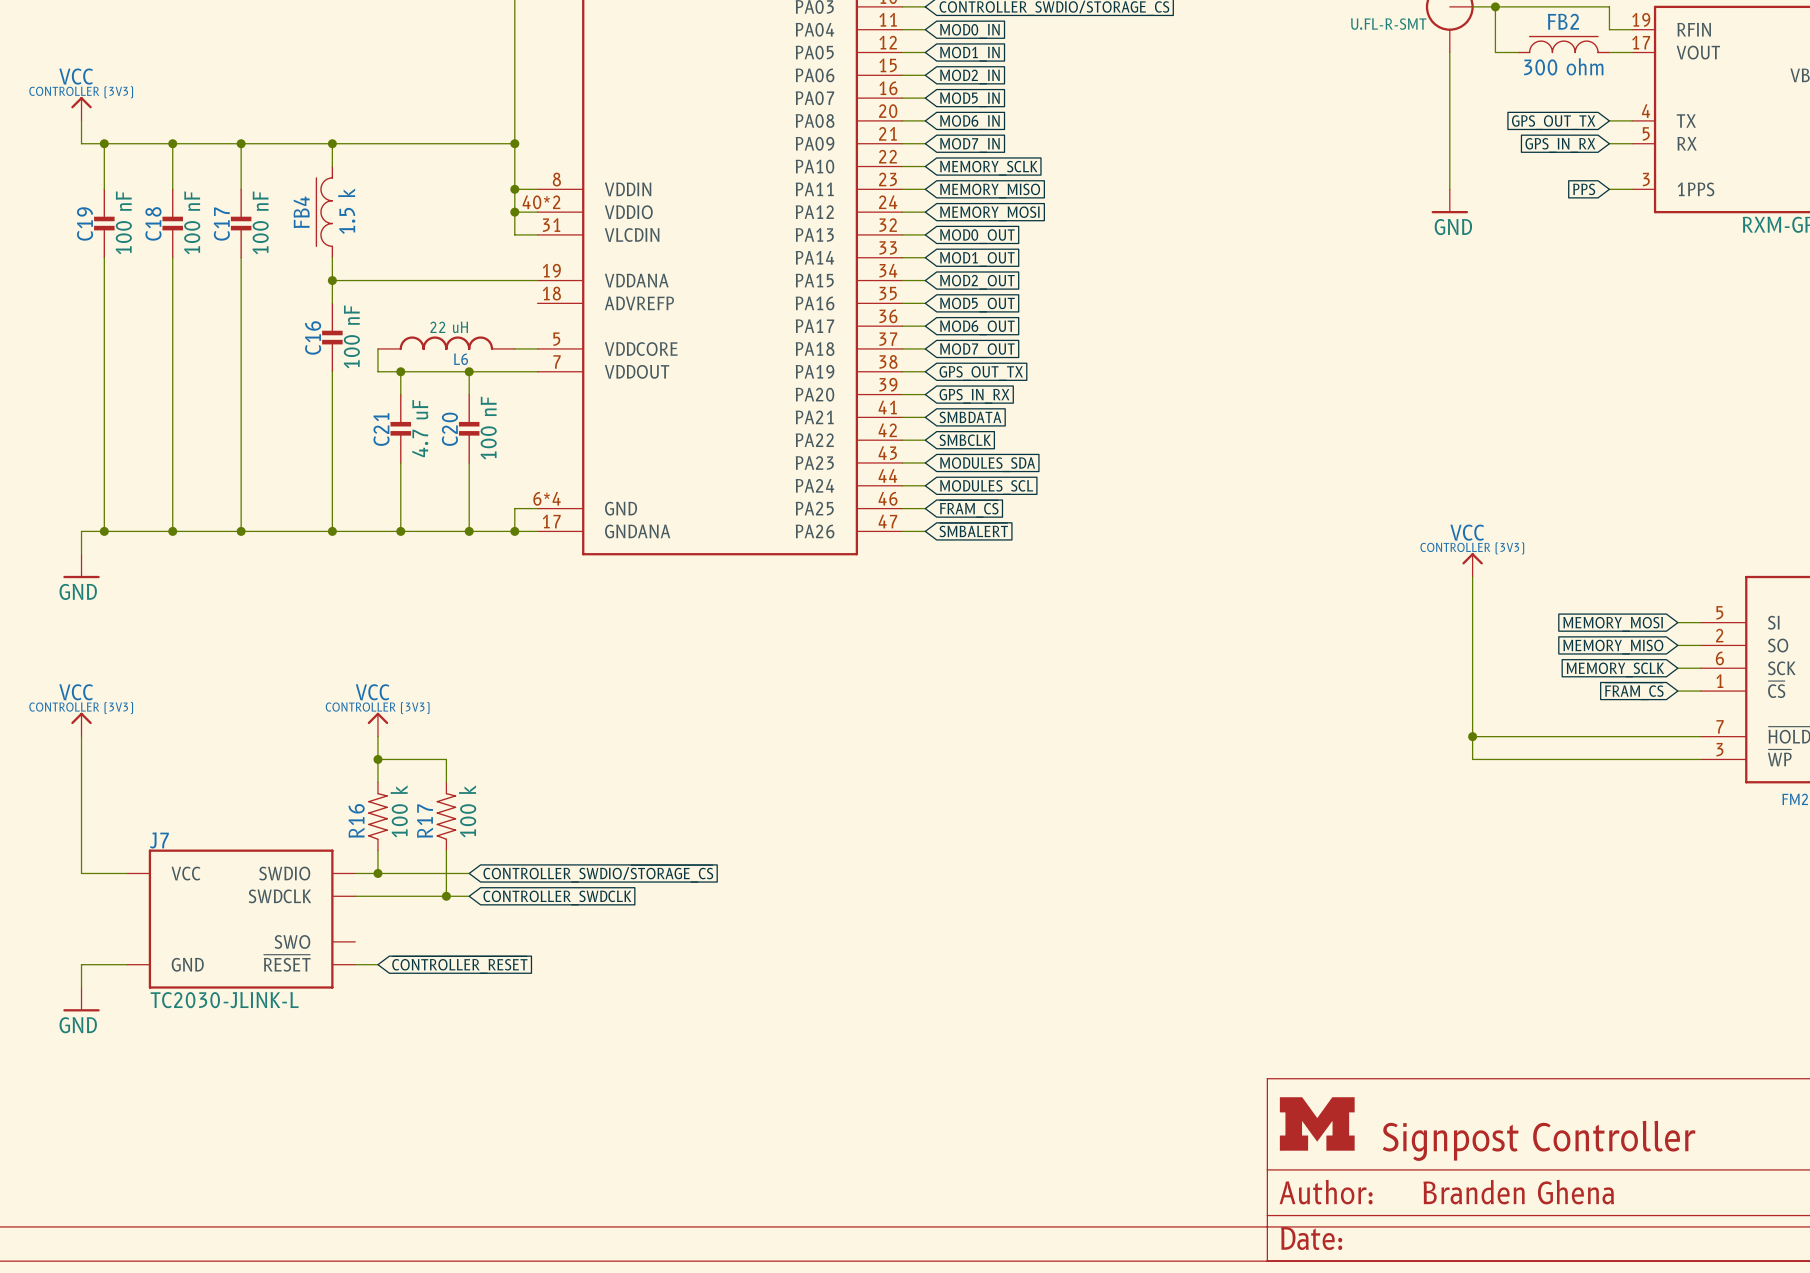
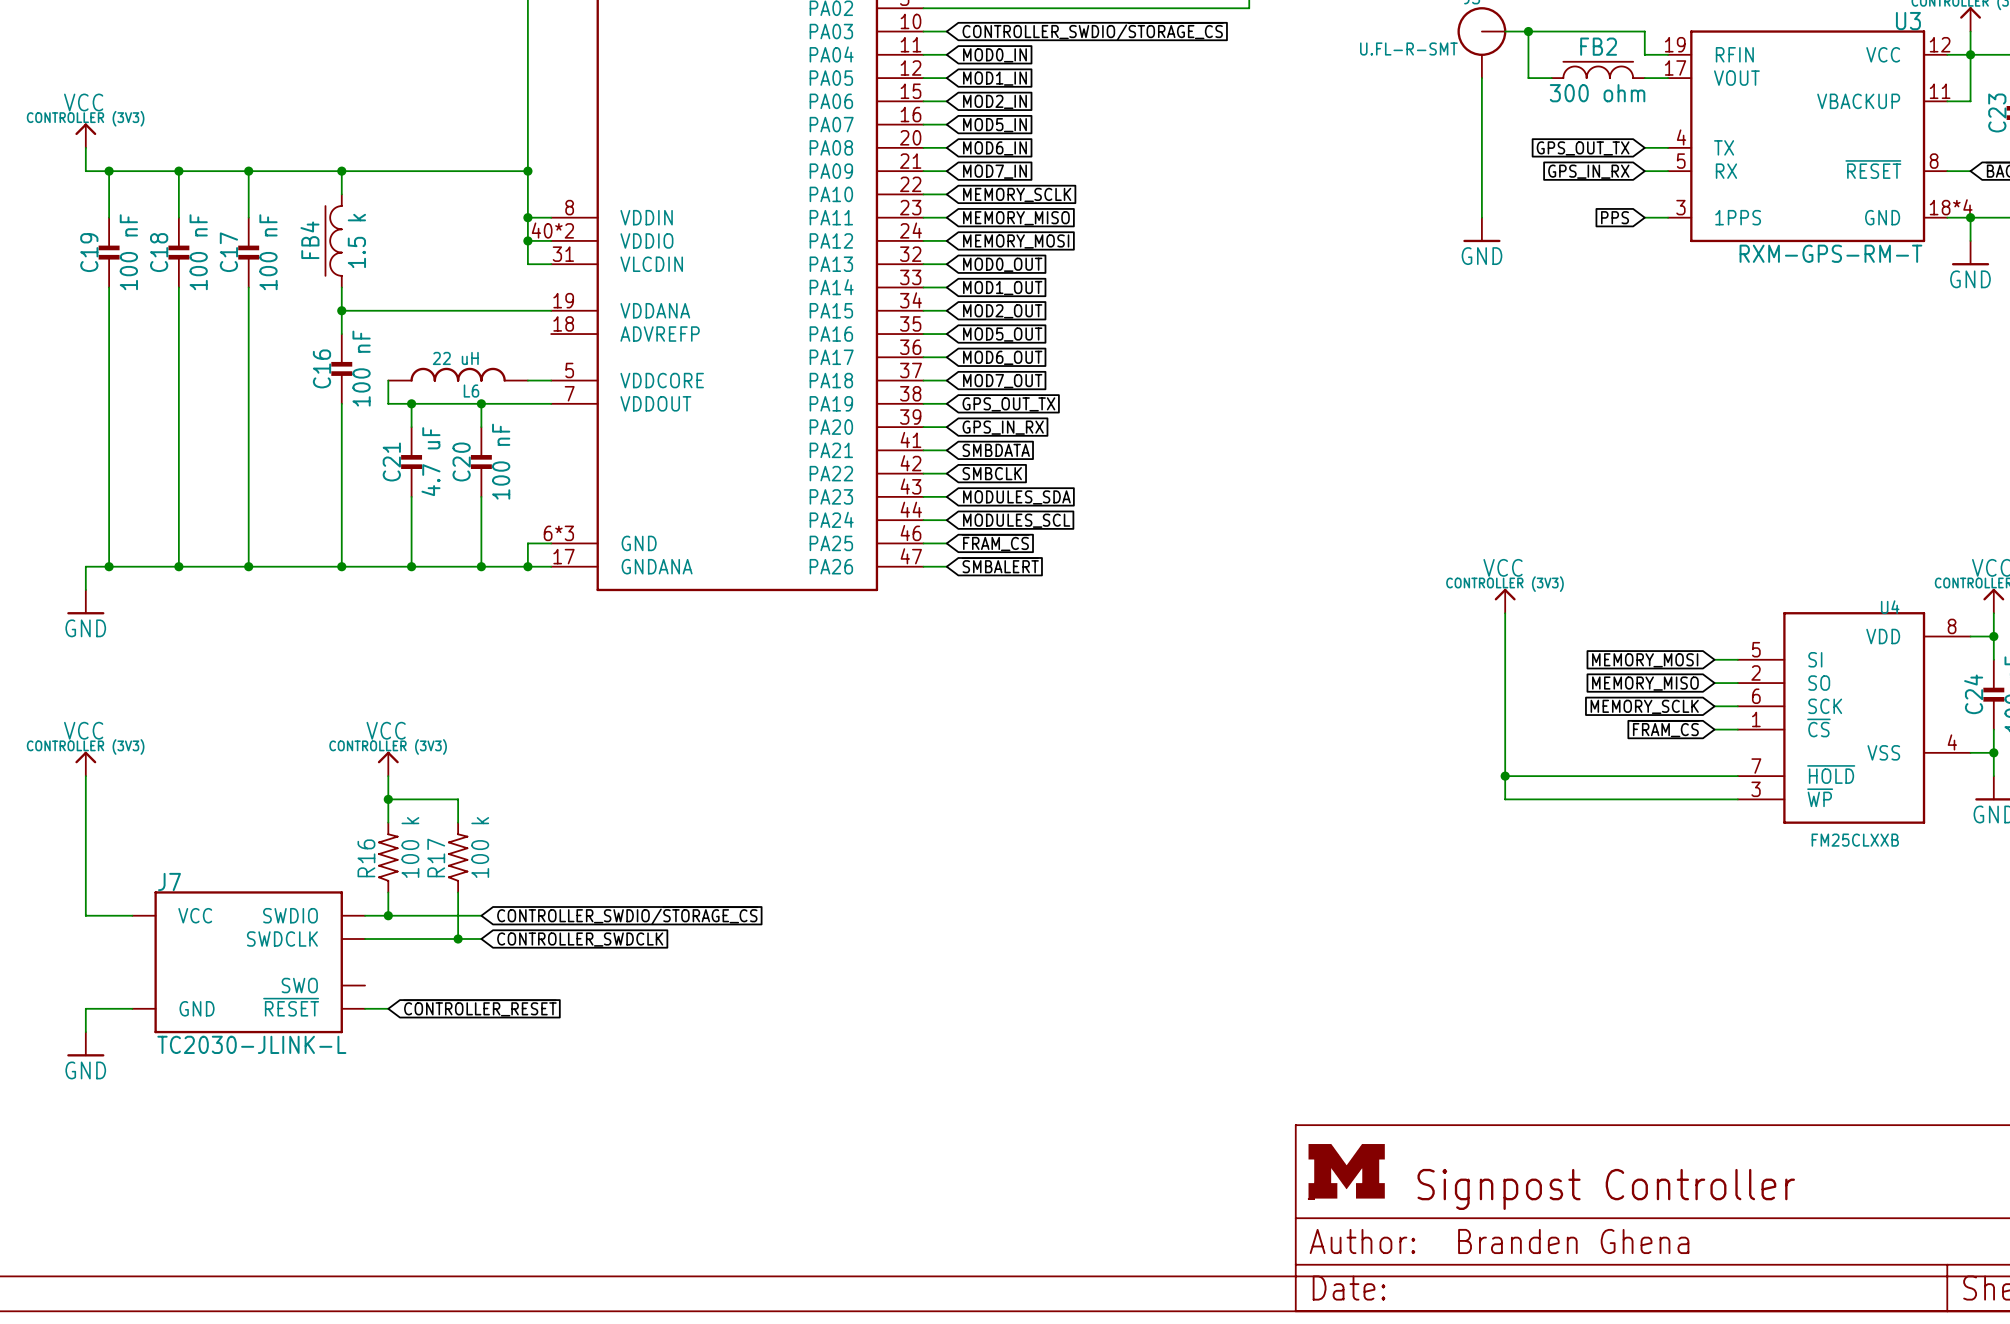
part pin number: 6*4 (547, 498) -> 6*3 (558, 533)

